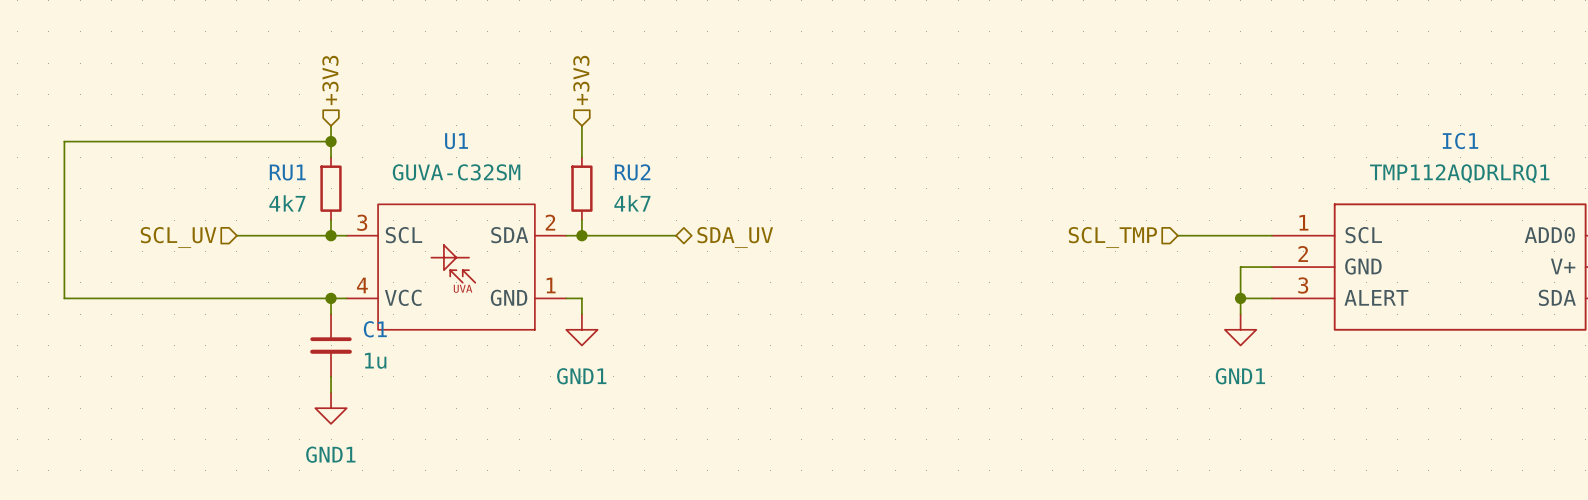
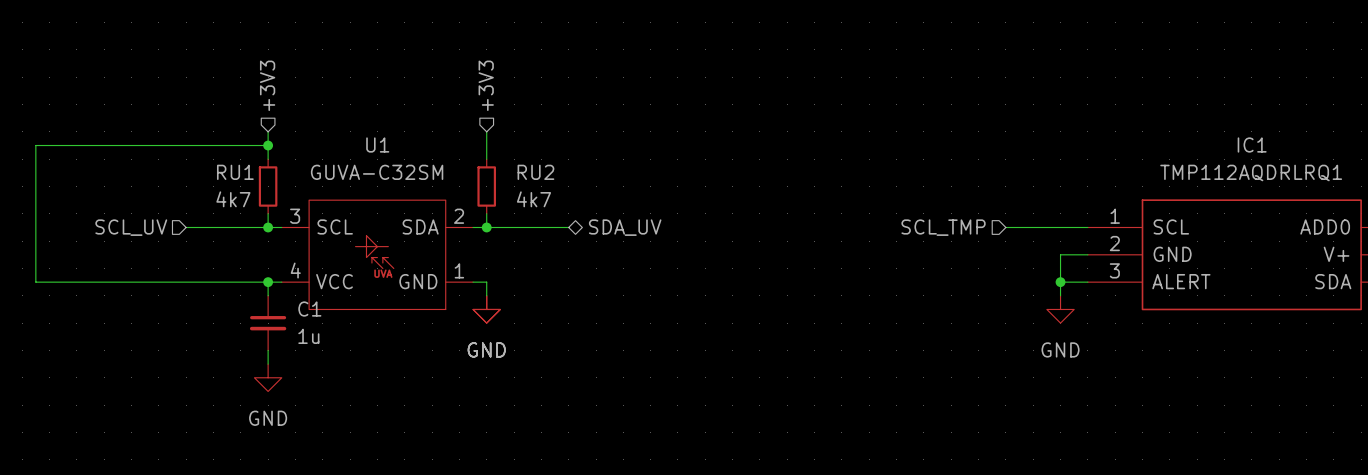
power symbol: GND1 (581, 329) -> GND (486, 309)
power symbol: GND1 (1240, 329) -> GND (1060, 309)
power symbol: GND1 (331, 408) -> GND (268, 377)

